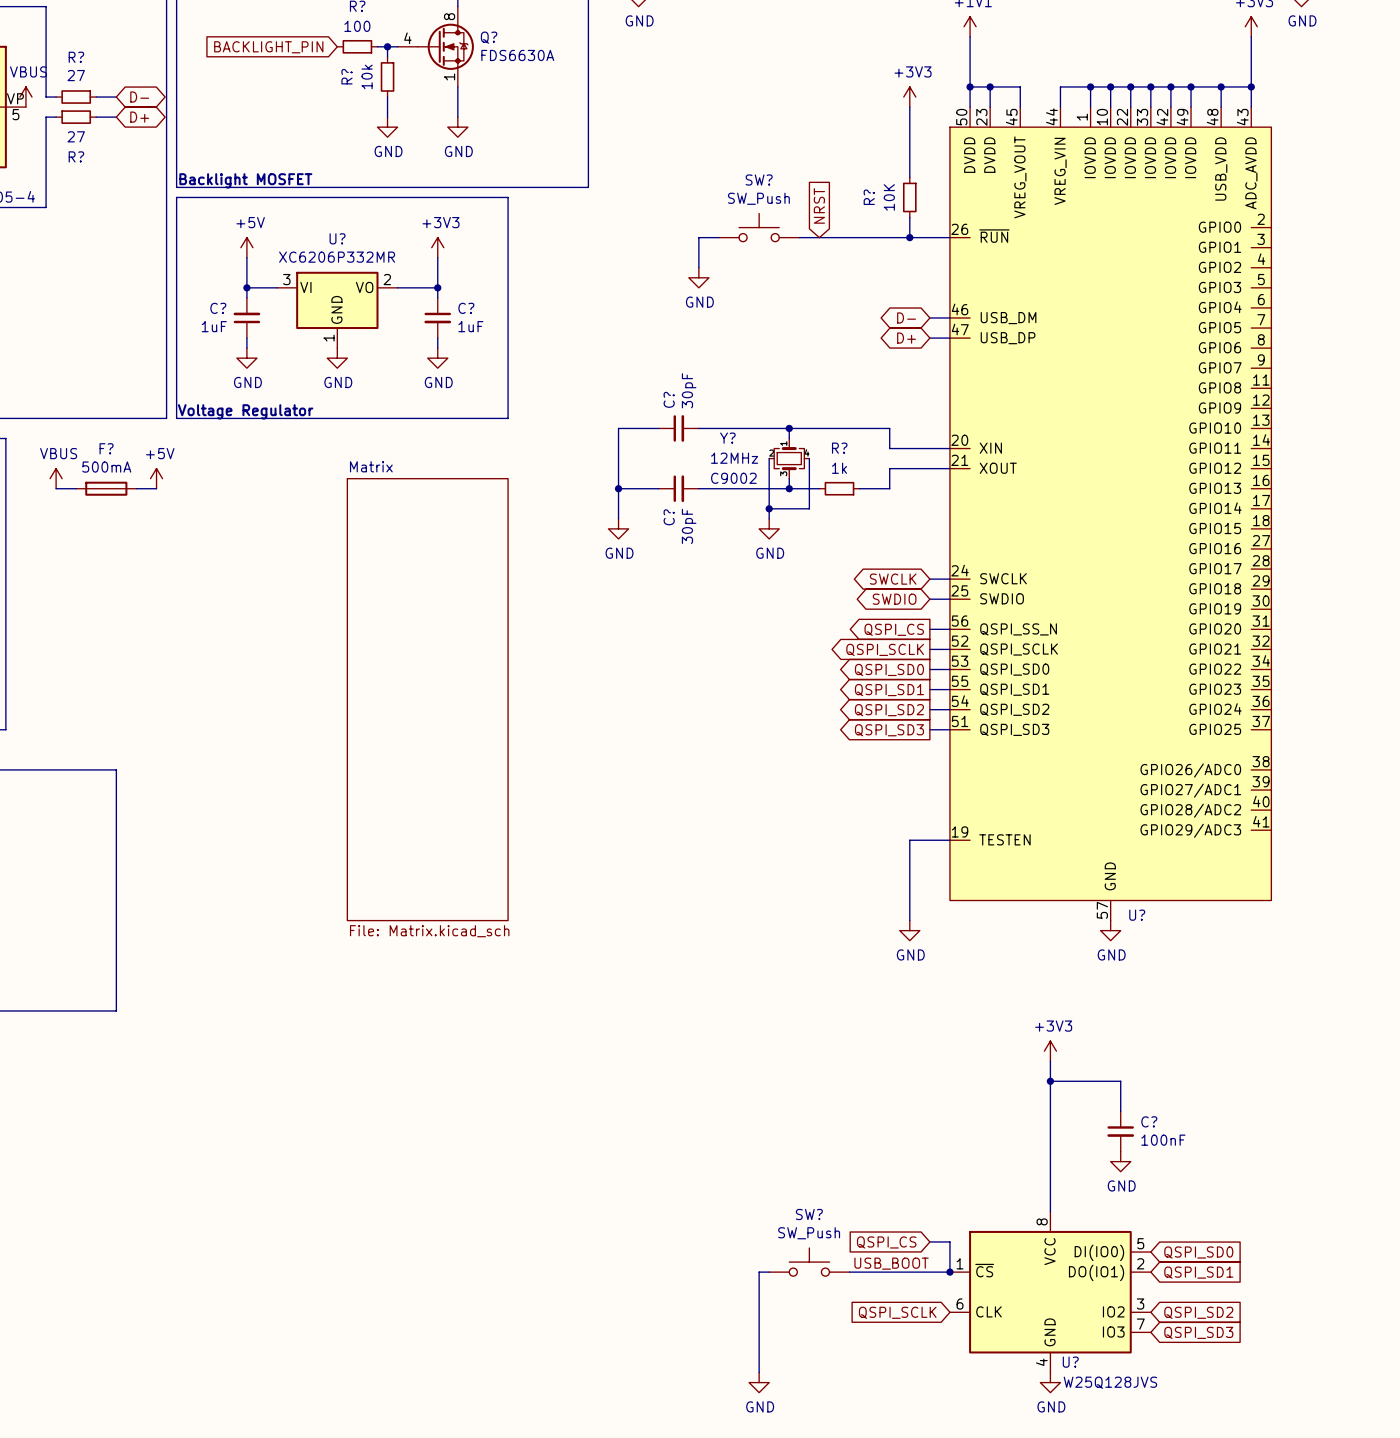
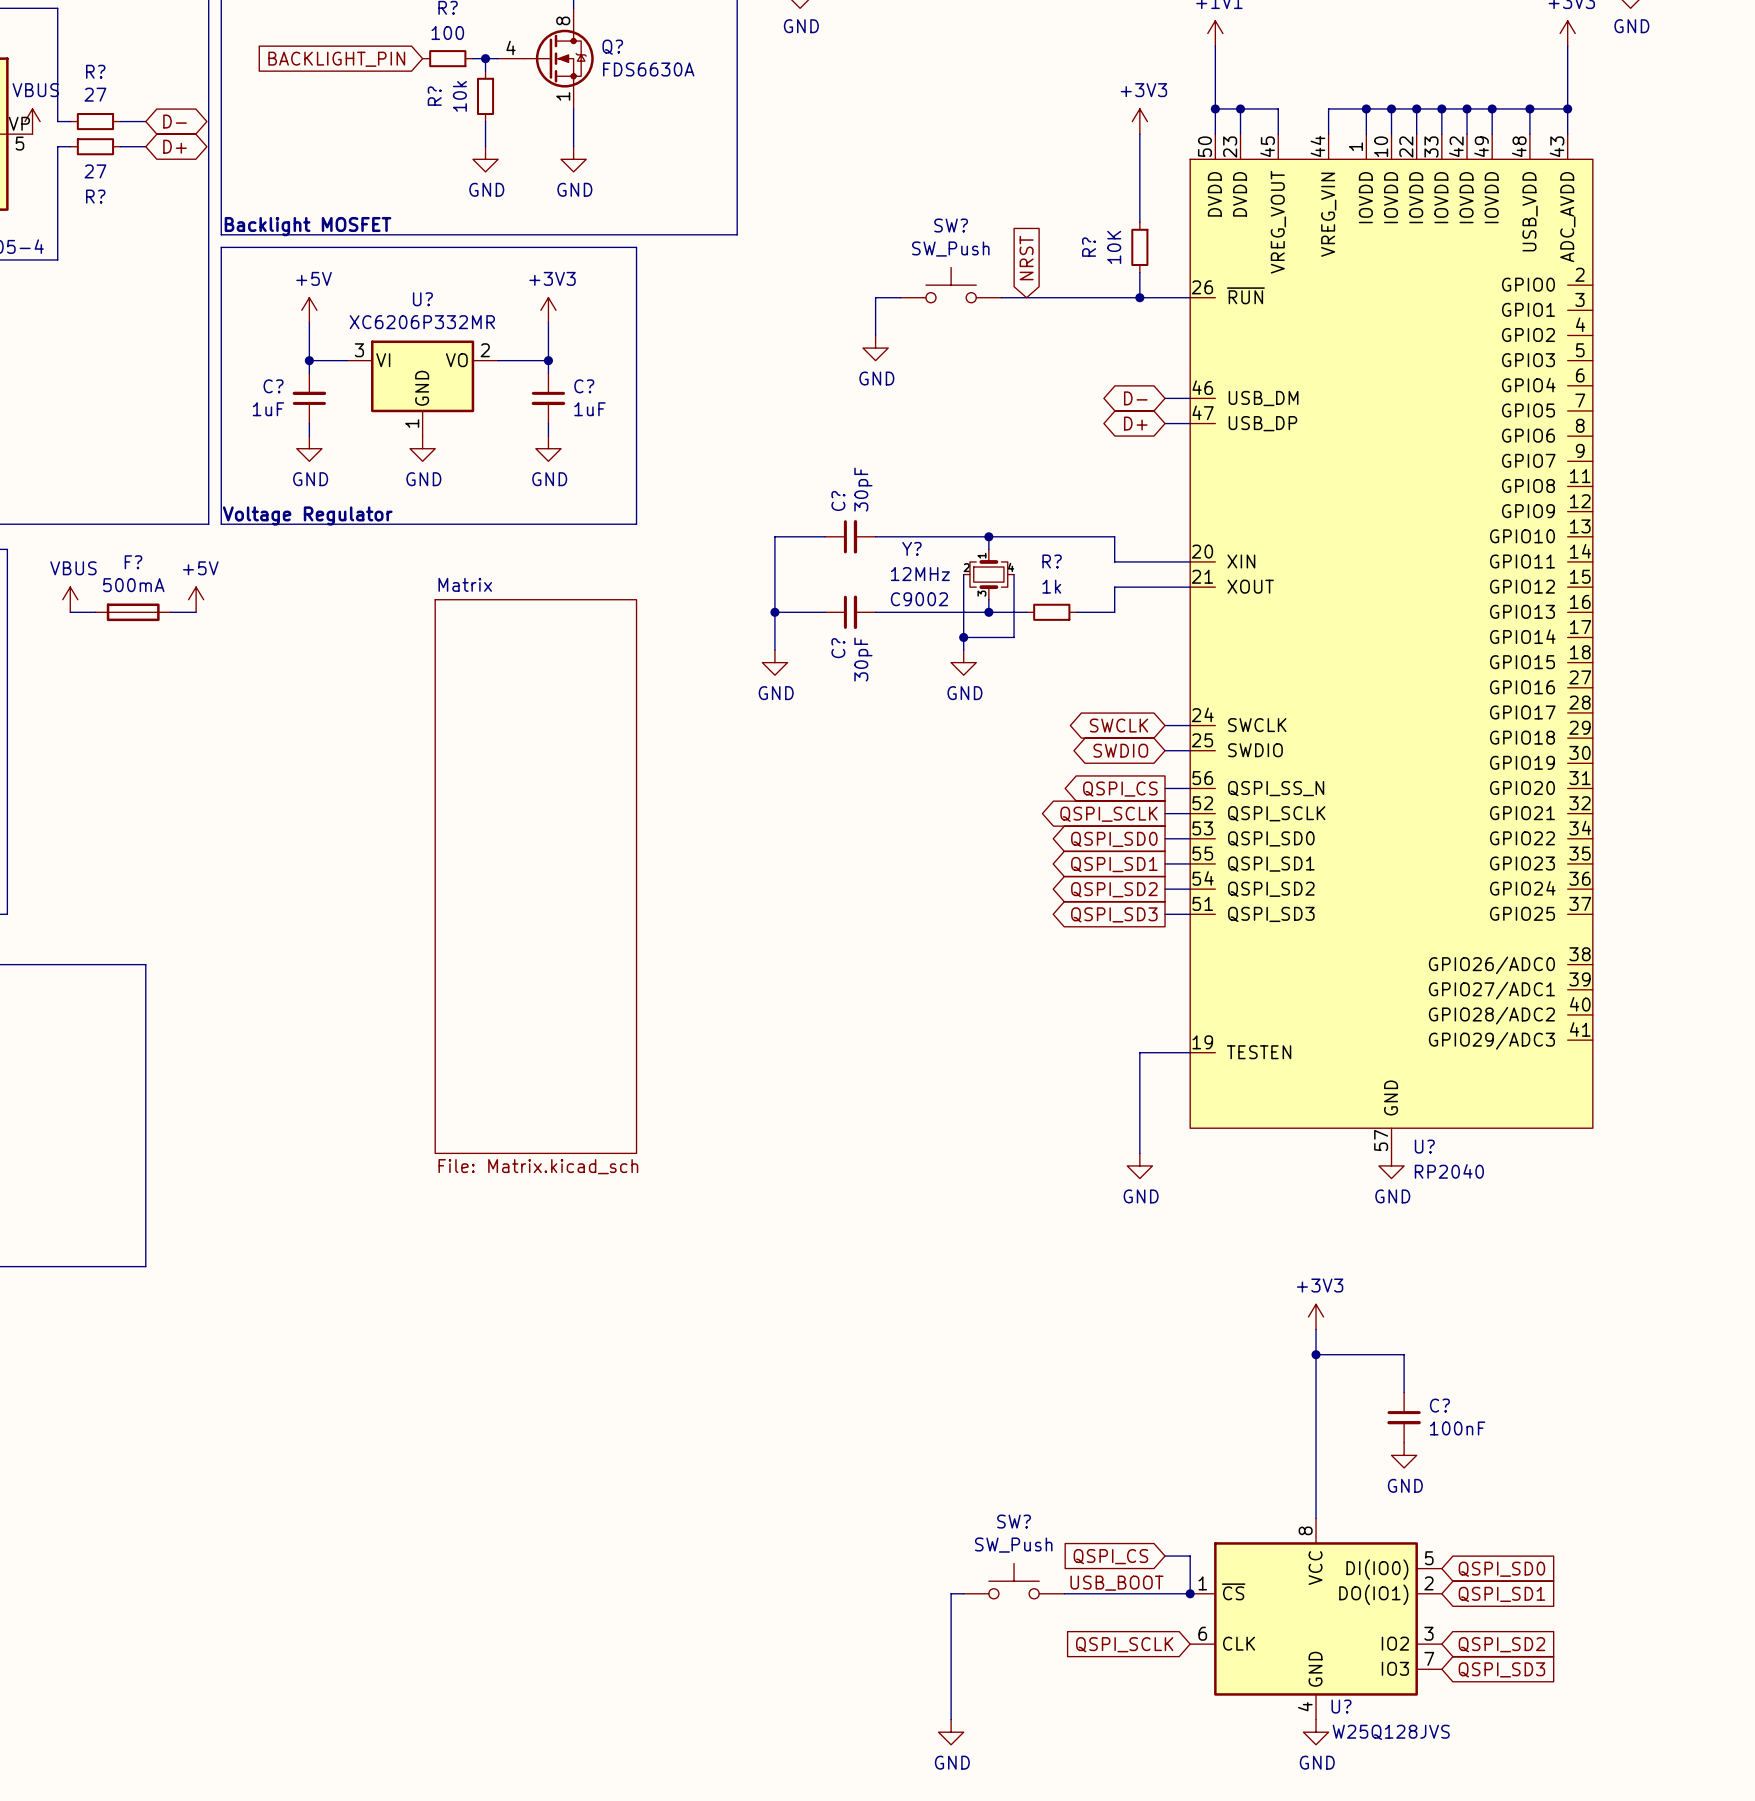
U? value: none -> RP2040 (1449, 1171)

